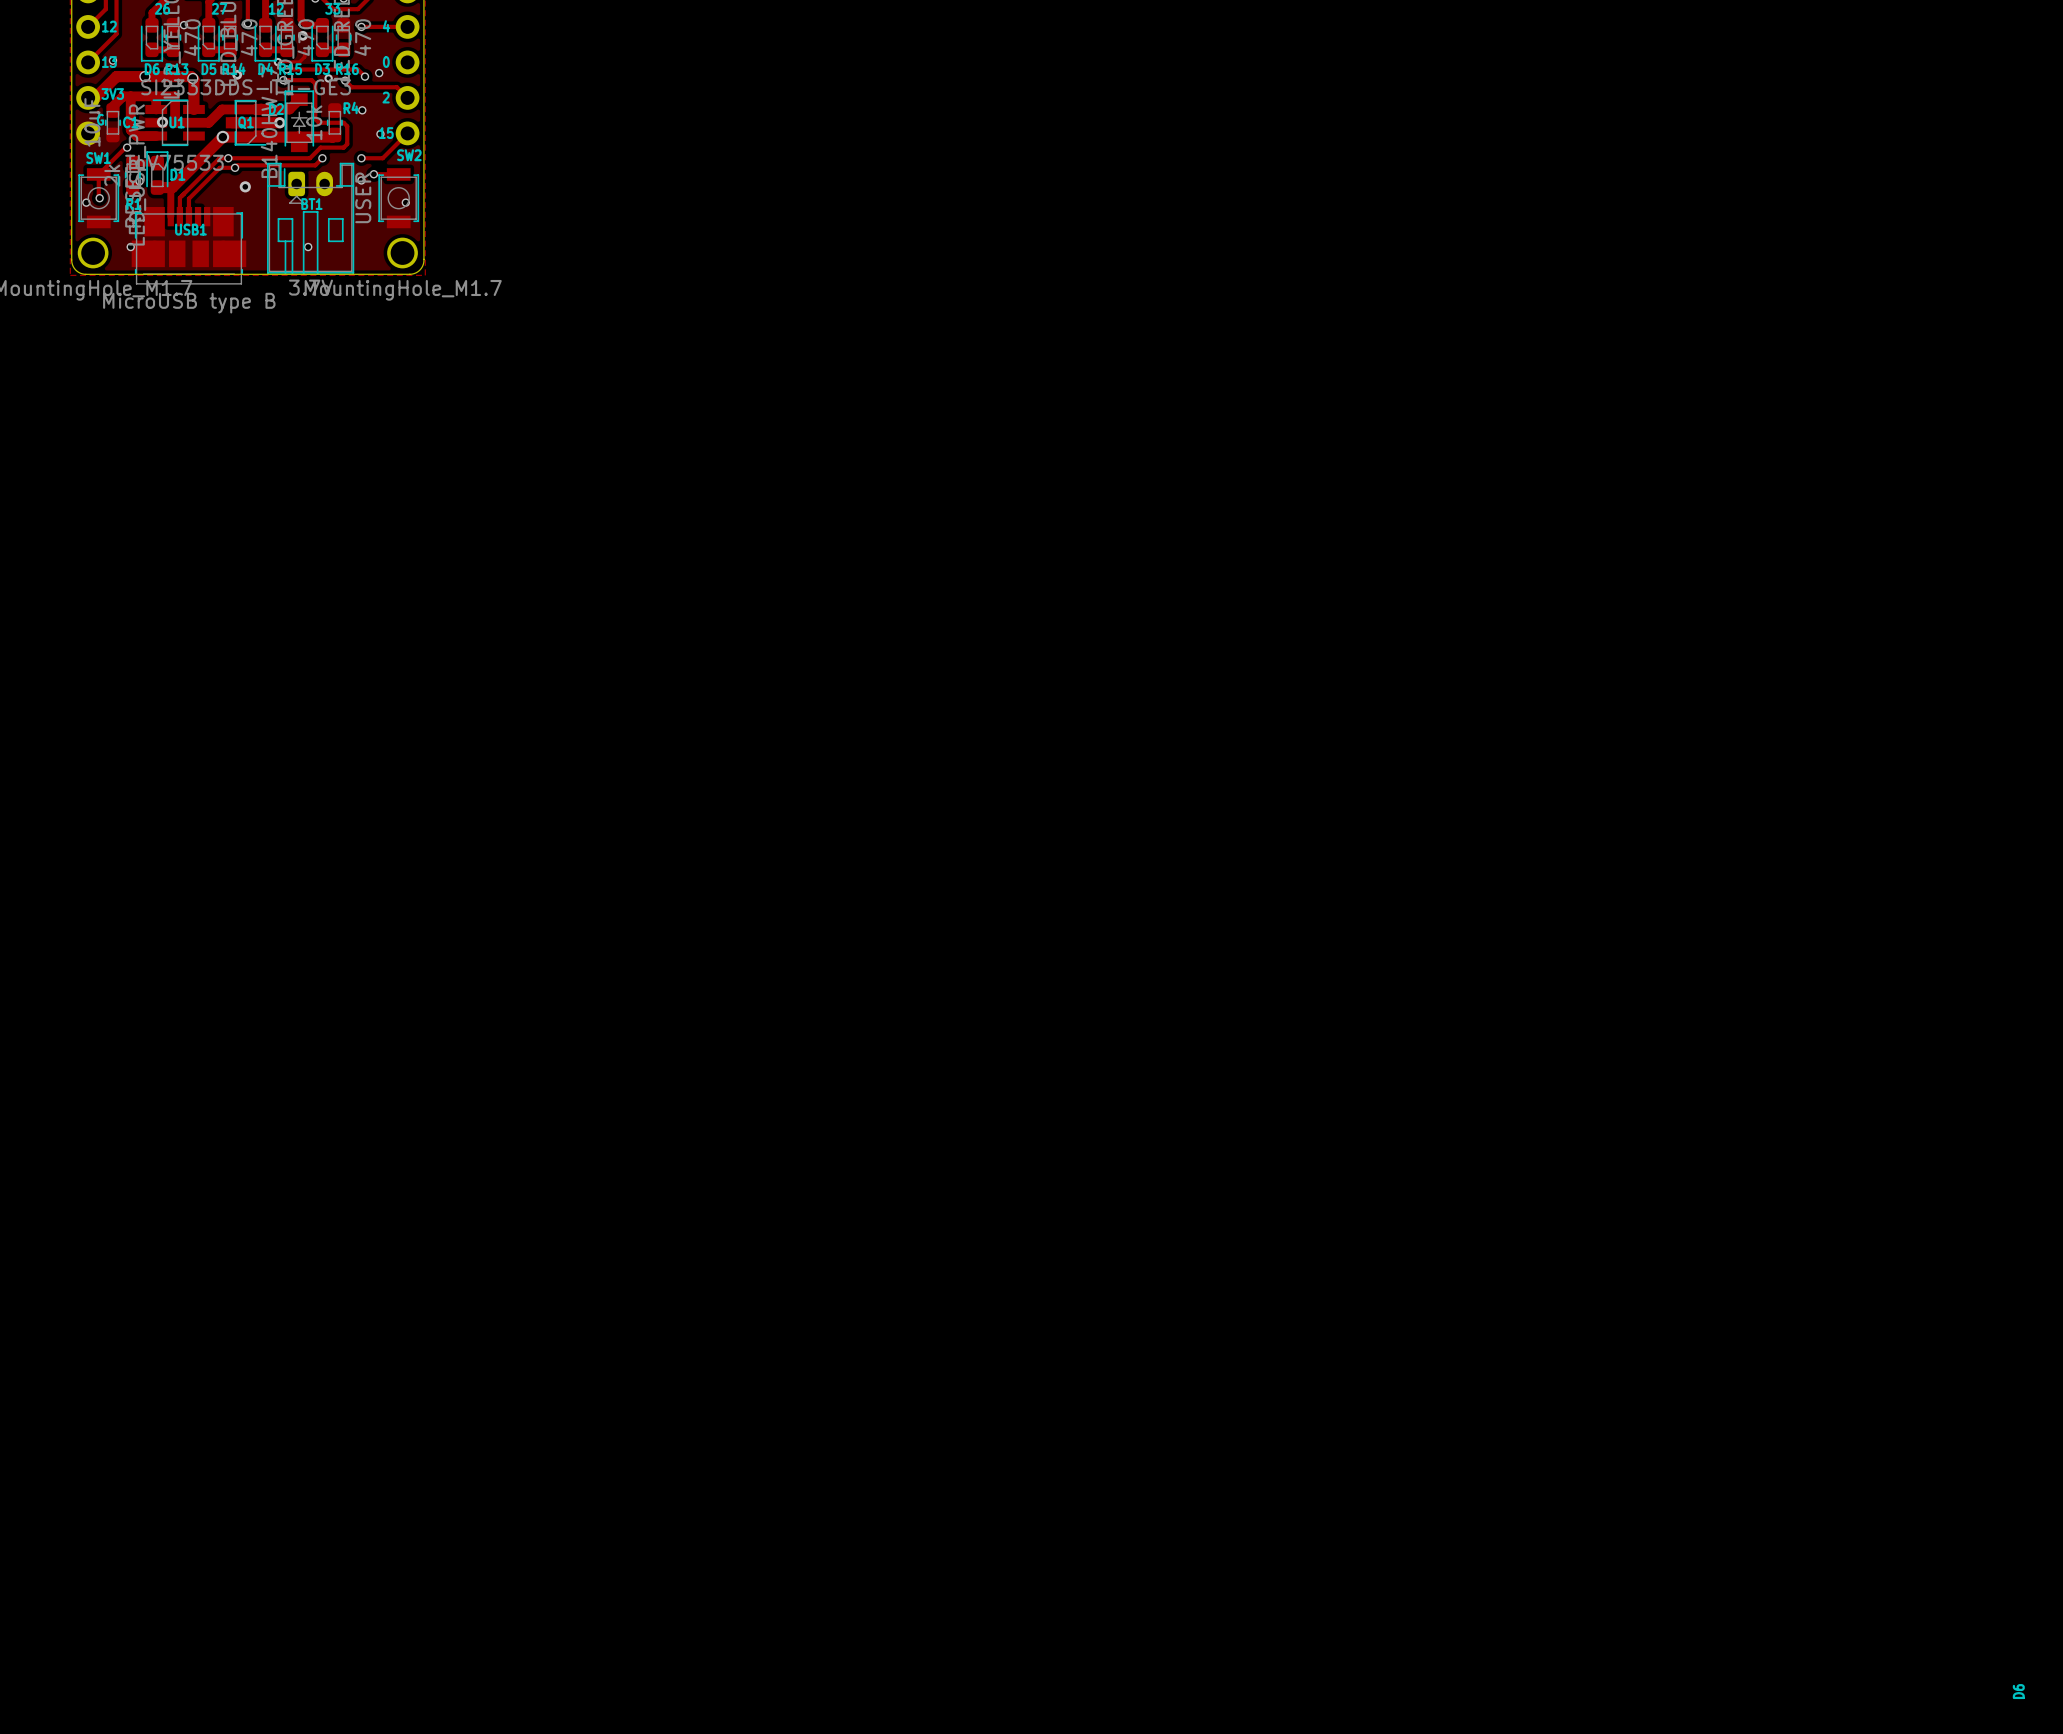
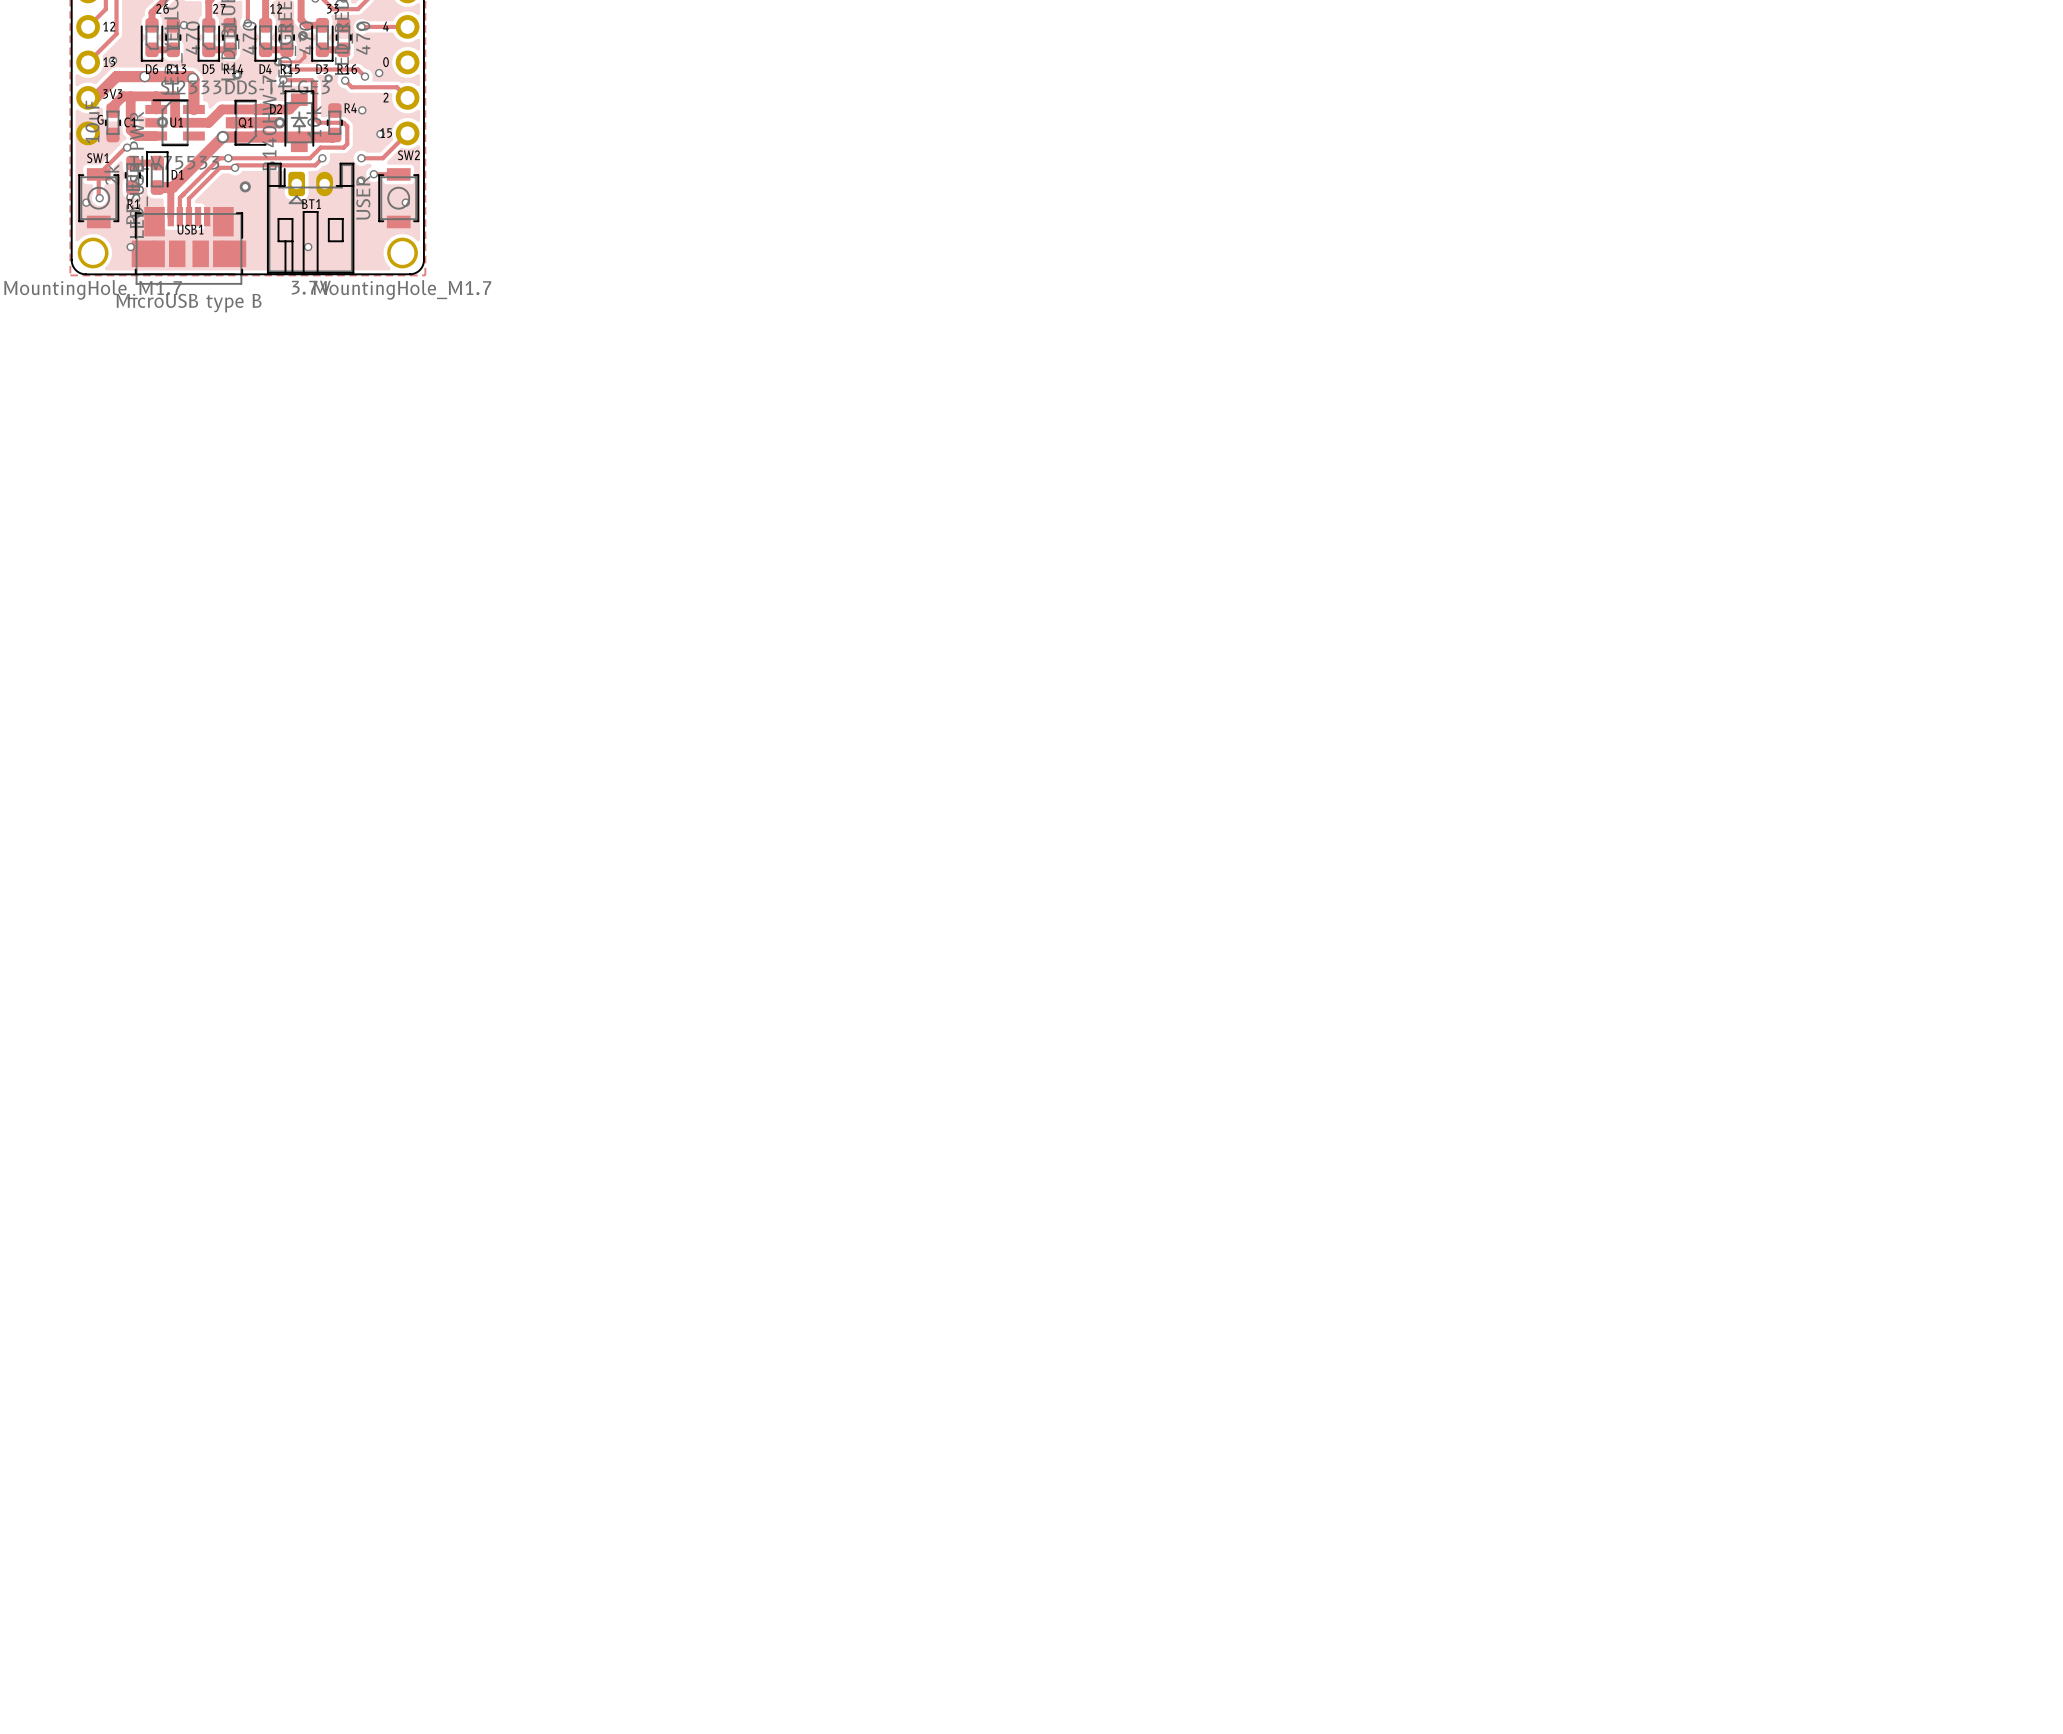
drawing: [2012, 1684, 2025, 1700] -> none

